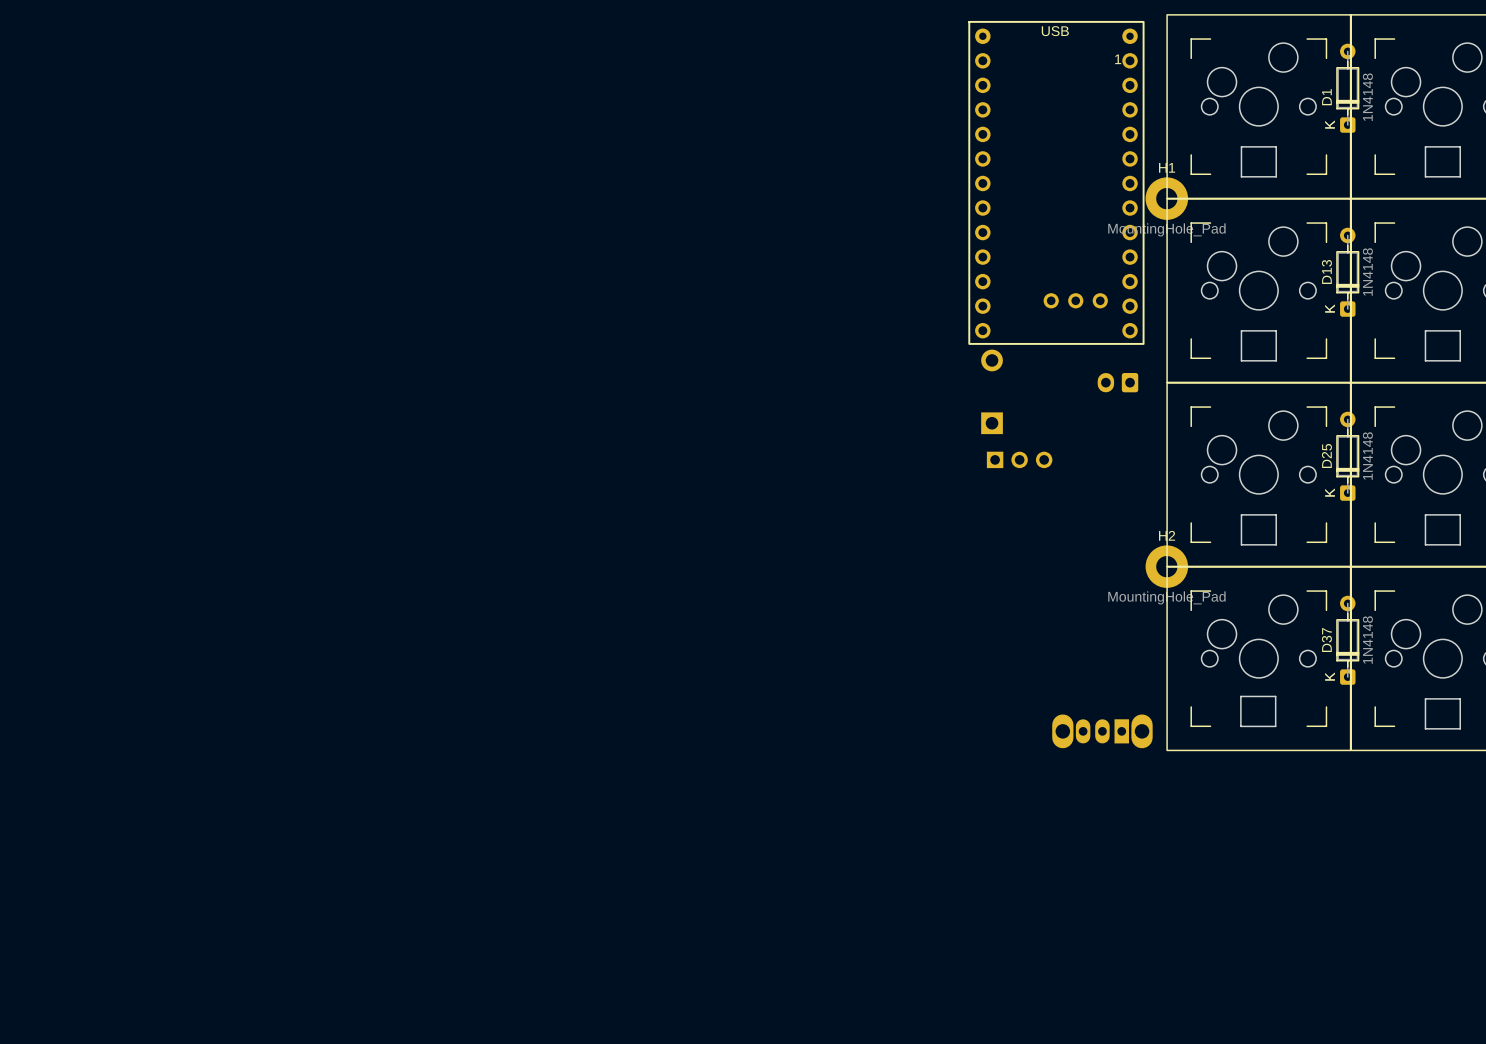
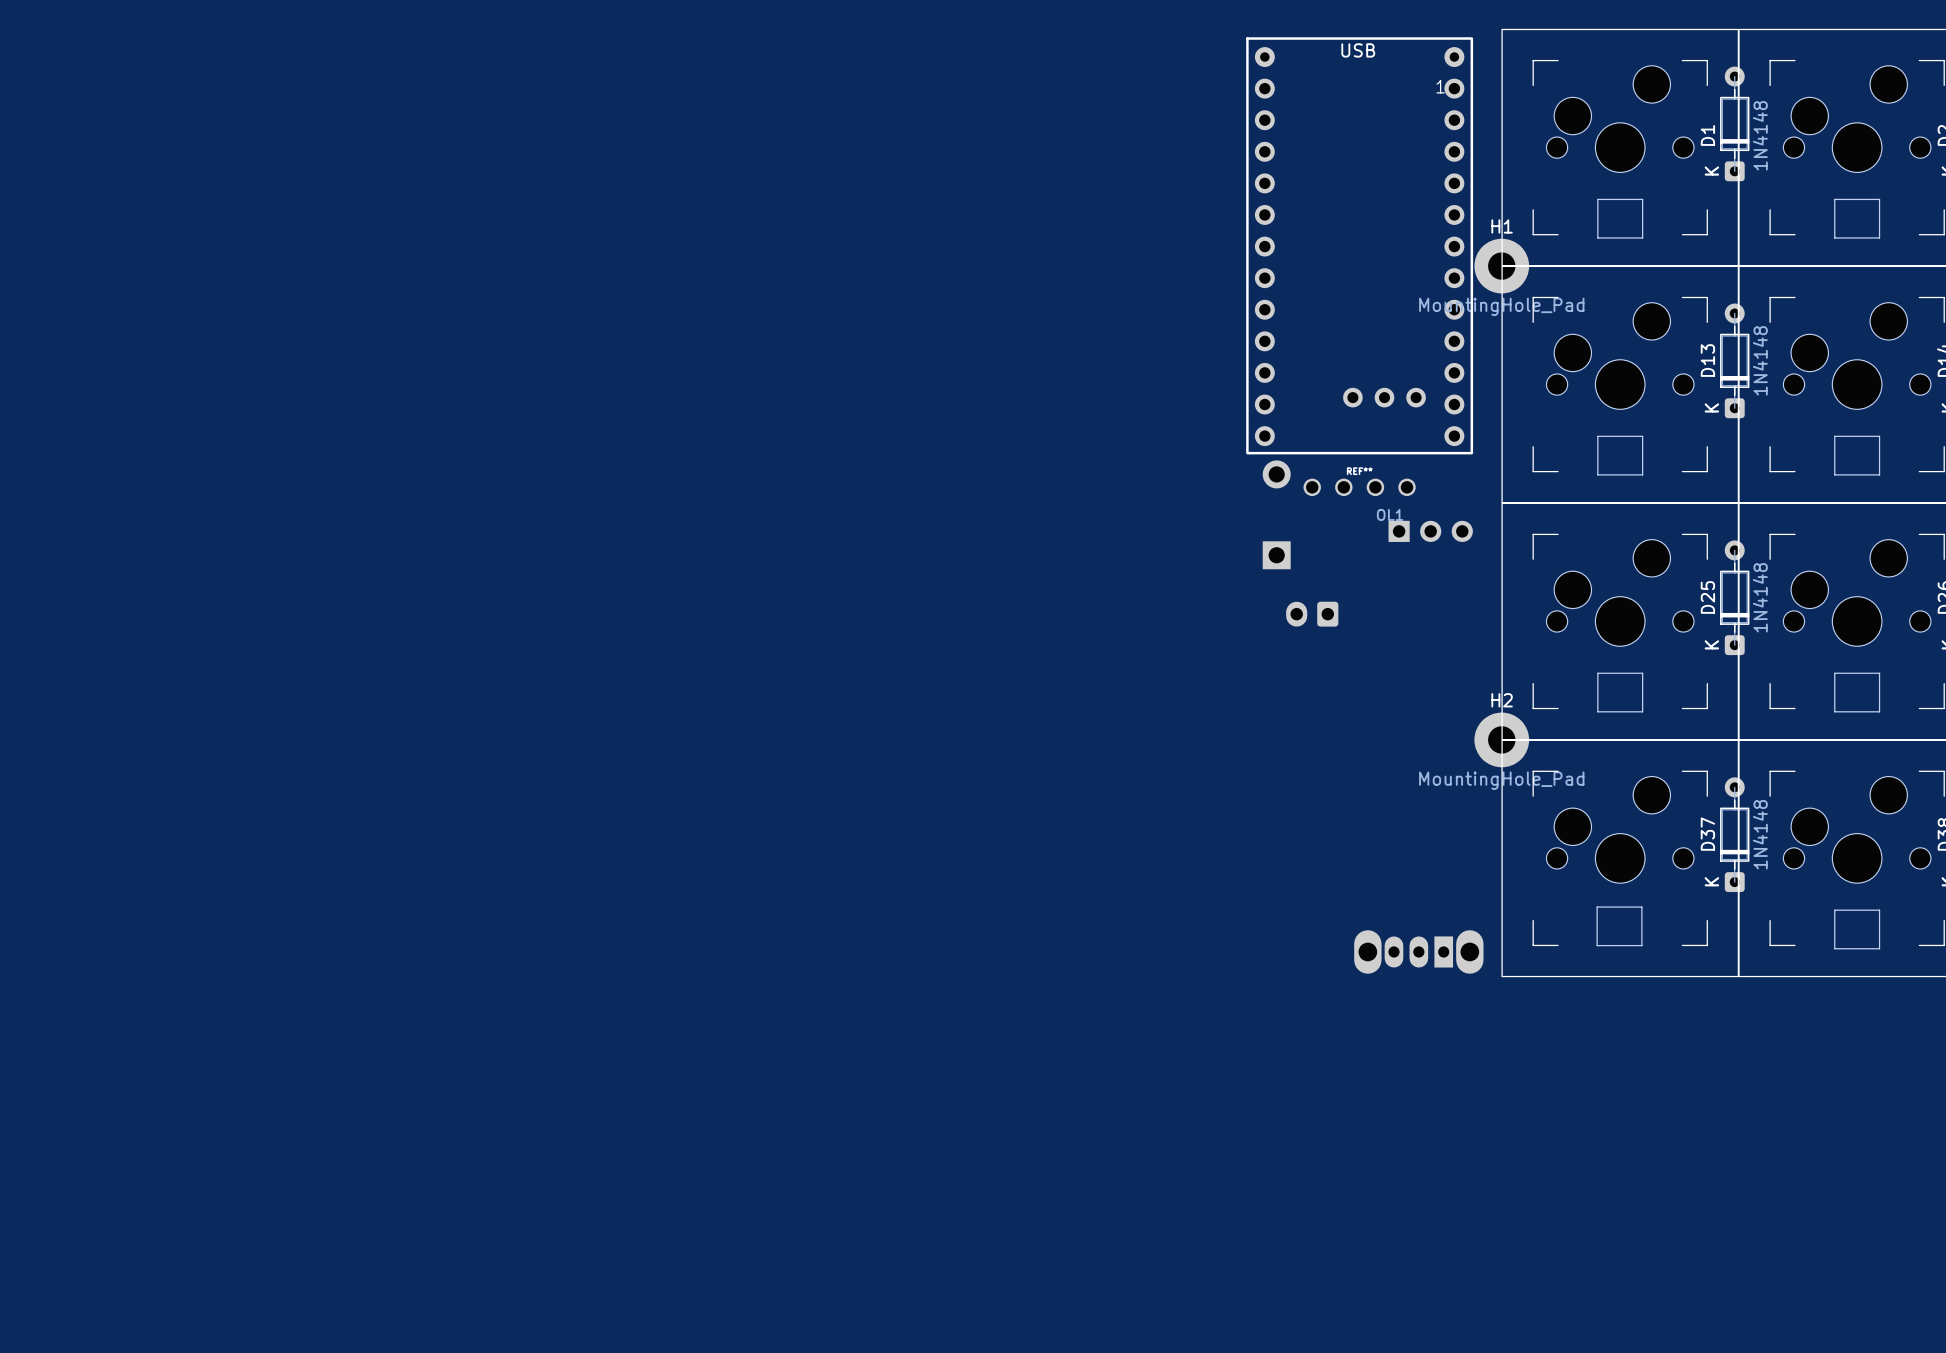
OL1: none -> (1359, 487)
part: (1117, 382) -> none
part: none -> (1430, 531)
part footprint: [986, 451, 1053, 469] -> [1286, 601, 1339, 627]

